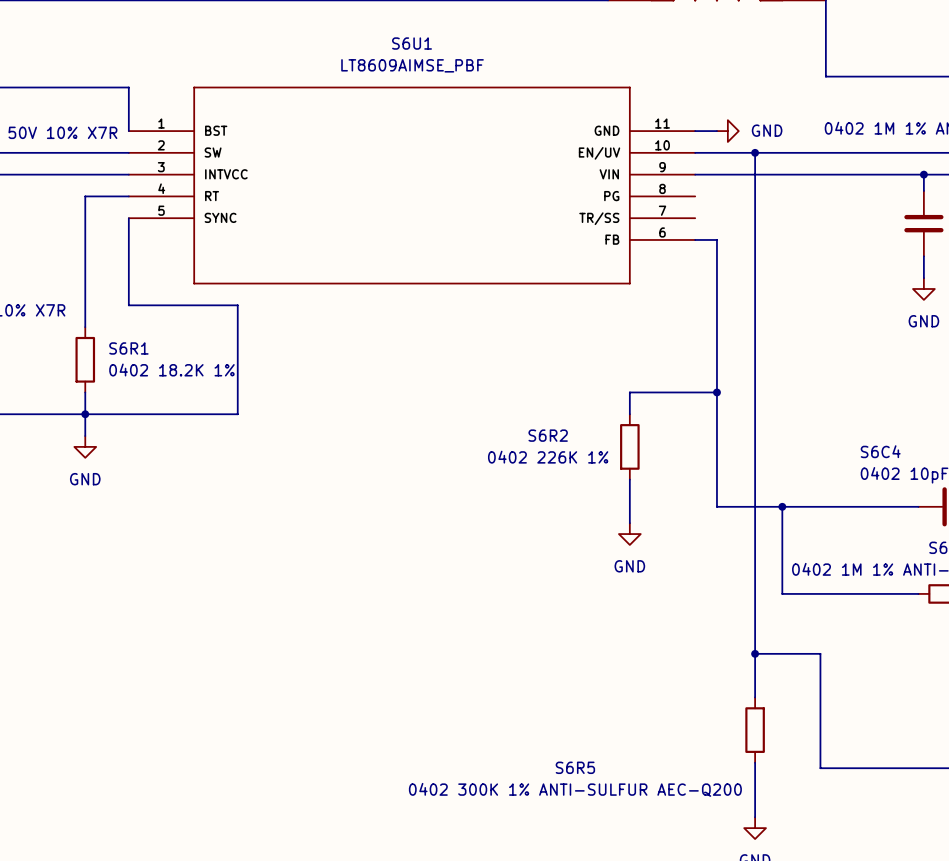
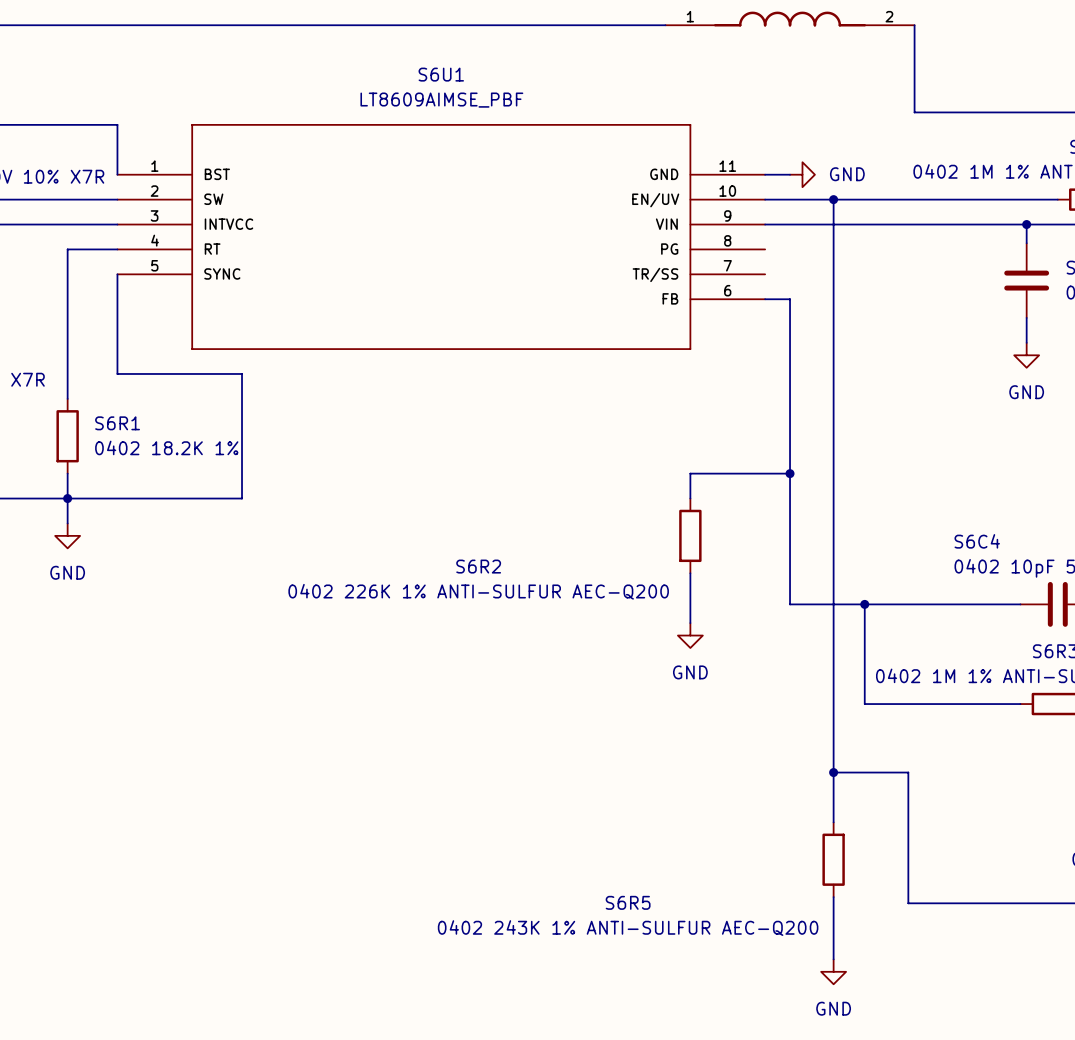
S6R2 name position: S6R2 (548, 435) -> S6R2 (478, 566)
S6R2 value: 0402 226K 1% (548, 457) -> 0402 226K 1% ANTI-SULFUR AEC-Q200 (478, 591)
S6R5 value: 0402 300K 1% ANTI-SULFUR AEC-Q200 (575, 789) -> 0402 243K 1% ANTI-SULFUR AEC-Q200 (628, 928)

